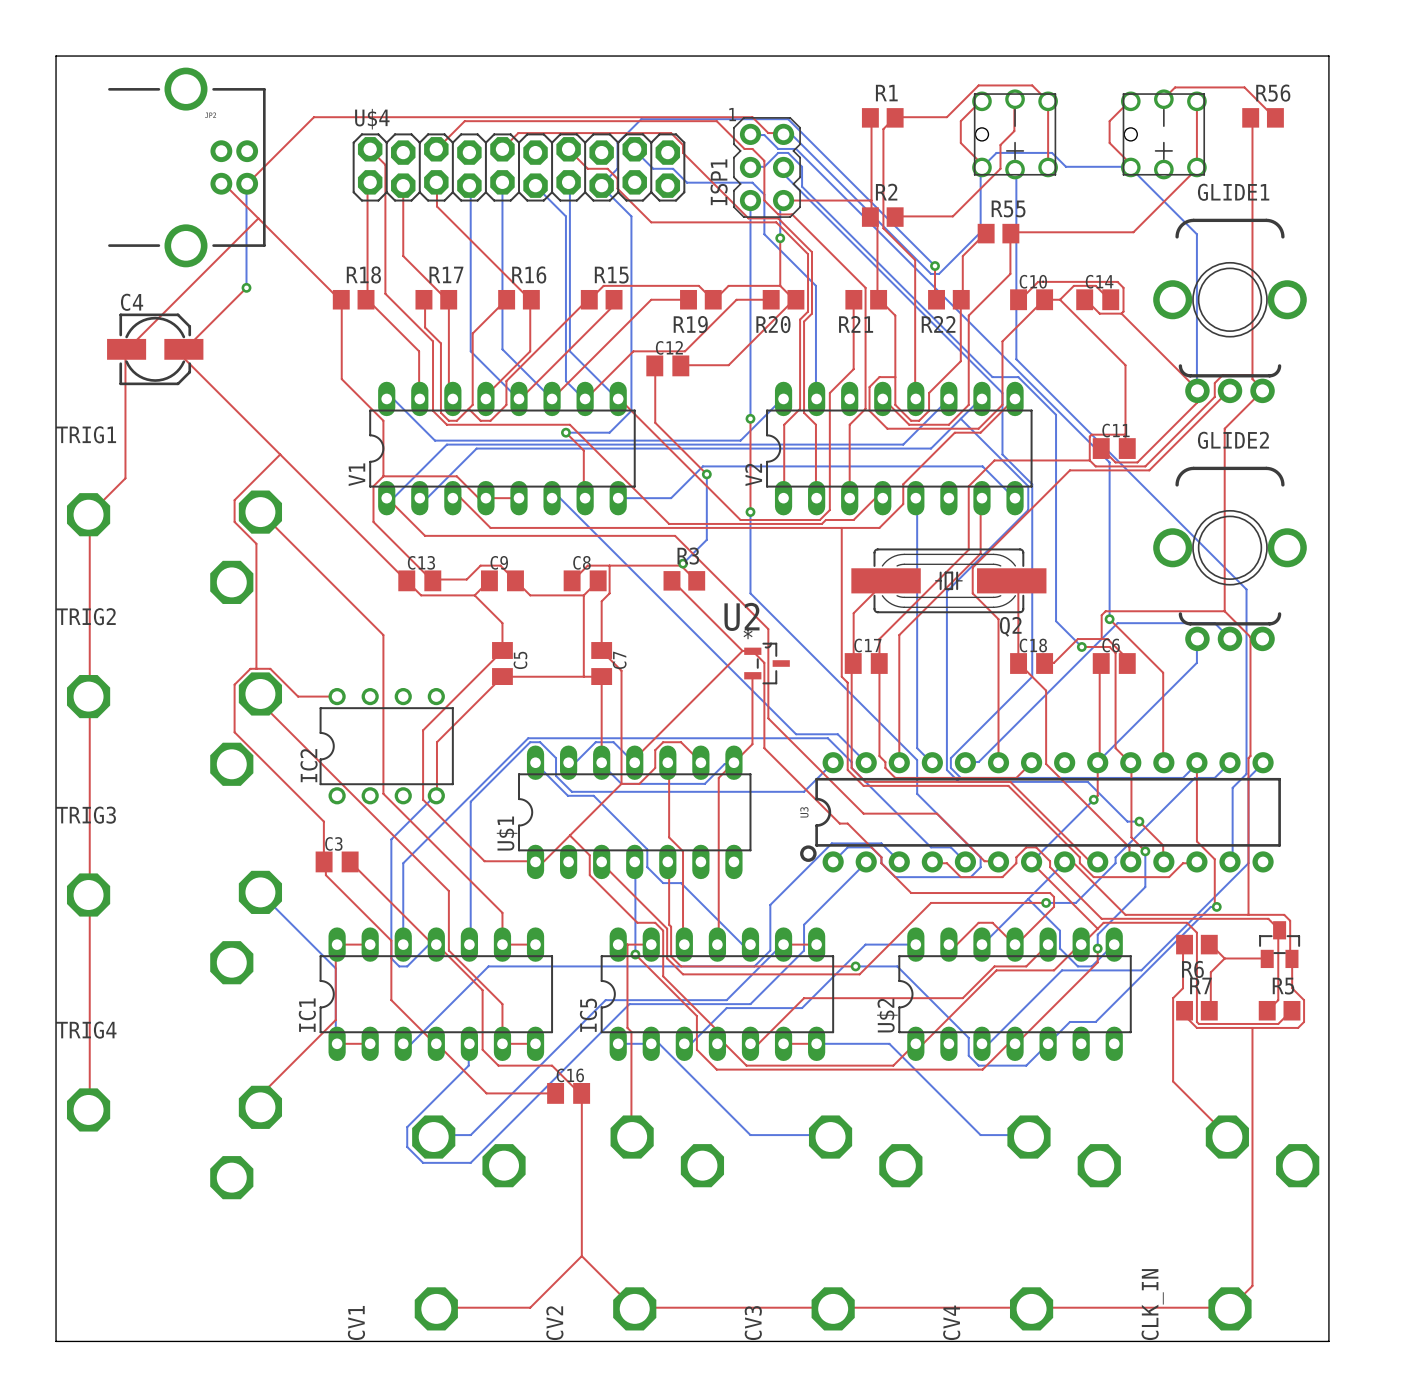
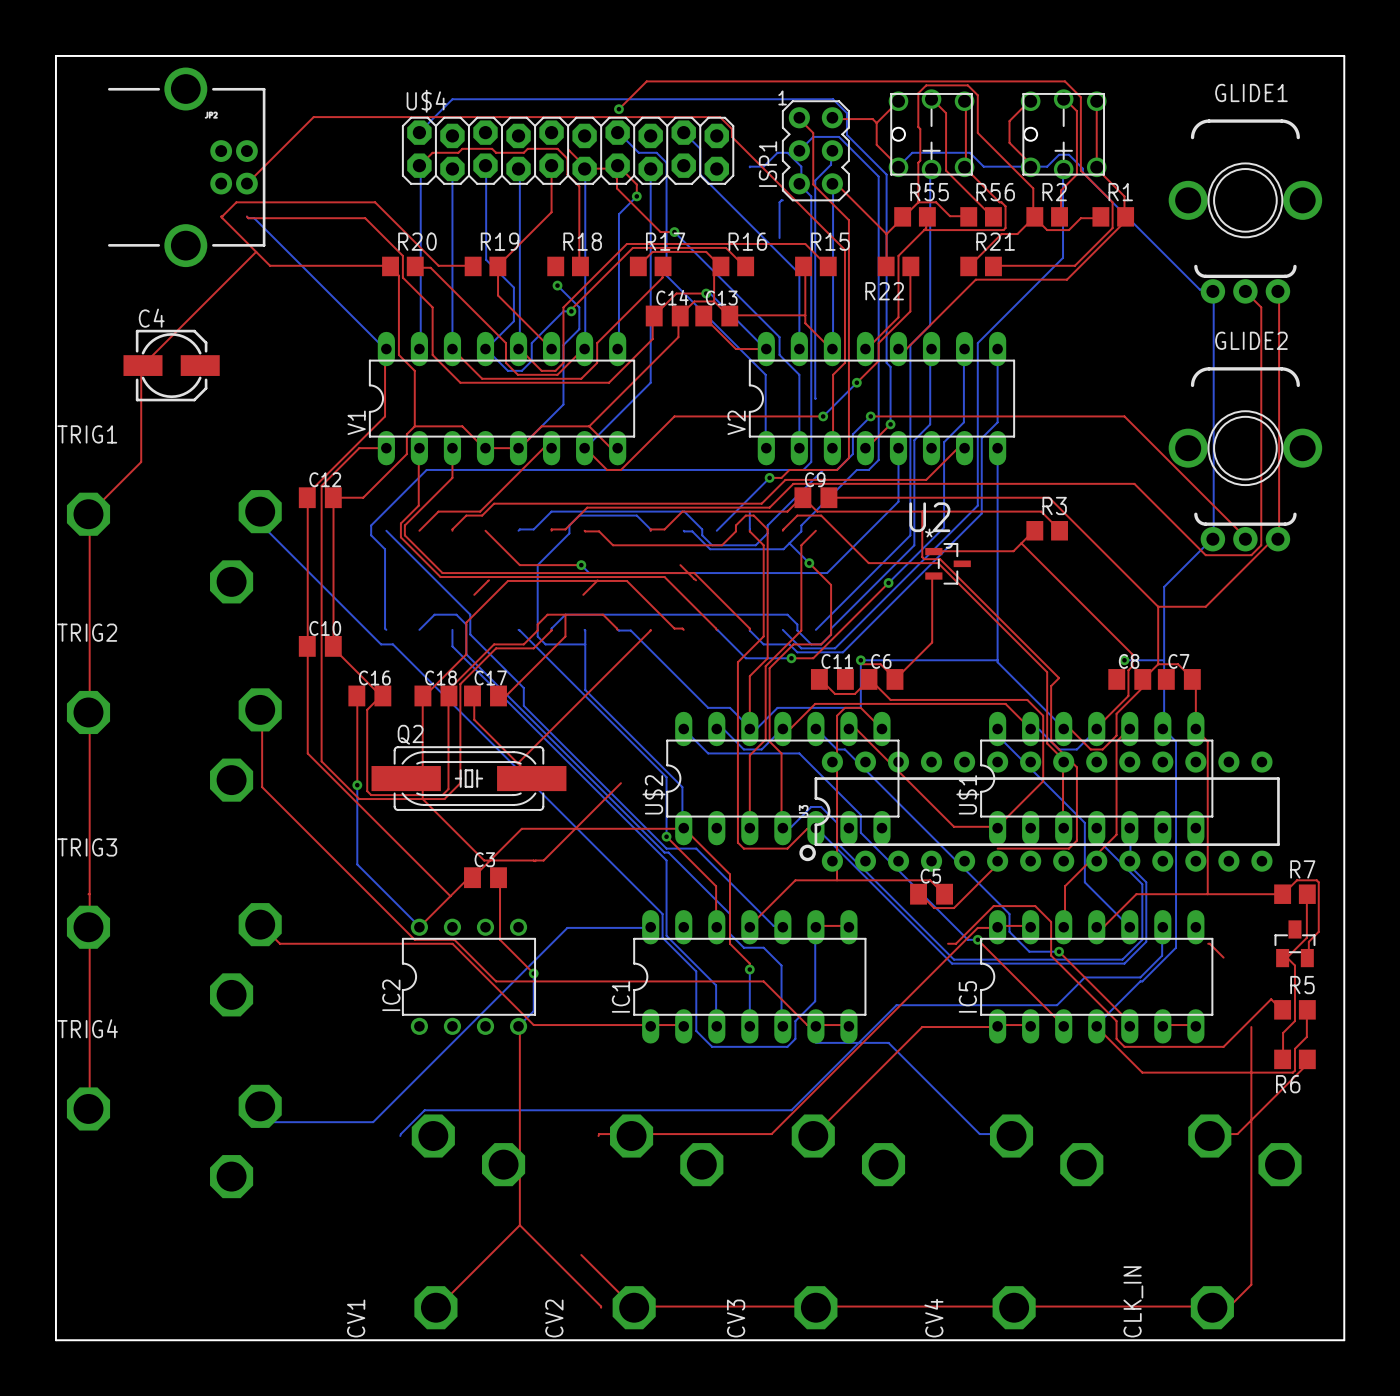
board edge: (1328, 56) (1328, 1341) -> (1327, 55) (1344, 55) (1344, 1340) (1327, 1340)
top track: none -> (931, 99) (946, 113) (946, 170) (993, 216)
top track: (1015, 99) (1014, 131) (1000, 144) (1000, 168) (952, 216) -> (968, 216) (952, 216)
top track: none -> (1063, 99) (1076, 111) (1076, 174) (1061, 190) (1059, 216)
top track: (1163, 99) (1175, 87) (1244, 87) (1275, 117) -> none
top track: none -> (898, 101) (876, 123)
top track: none -> (964, 101) (964, 167) (1005, 206) (1005, 228) (1003, 230) (924, 230)
top track: (981, 101) (960, 121) (960, 142) (980, 162) (981, 167) -> (1030, 101) (1009, 121) (1009, 142) (1029, 162) (1030, 167)
top track: none -> (1096, 101) (1096, 168) (1124, 196) (1124, 222) (1067, 279) (975, 279) (906, 349) (898, 349)
top track: (1130, 101) (1109, 121) (1109, 142) (1129, 162) (1130, 167) -> none
top track: (1196, 101) (1196, 168) (1133, 232) (1010, 233) (1010, 273) (968, 315) (968, 404) (948, 424) (909, 424) (882, 398) -> none
top track: none -> (618, 109) (646, 81) (1065, 81) (1080, 97) (1080, 170) (1112, 202) (1112, 228) (1074, 265) (993, 266)
via: none -> (618, 109)
top track: (720, 117) (752, 117) (768, 133) (783, 134) -> (720, 117) (731, 128) (731, 136)
top track: none -> (799, 117) (813, 132) (813, 184) (848, 220) (848, 424)
top track: none -> (832, 117) (872, 119) (876, 123)
top track: (870, 117) (871, 218) -> (832, 183) (837, 184) (870, 218)
R1 position: (882, 117) -> (1113, 216)
top track: (1250, 117) (1252, 119) (1252, 379) (1262, 390) -> none
R56 position: (1263, 117) -> (981, 216)
top track: none -> (876, 123) (876, 144) (898, 167)
bottom track: none -> (419, 132) (452, 99) (833, 99) (846, 113) (846, 134) (886, 174) (886, 362) (890, 366) (890, 424)
bottom track: none -> (617, 132) (638, 152) (656, 152) (666, 162) (666, 275) (765, 374) (765, 448)
bottom track: none -> (683, 132) (700, 148) (700, 174) (799, 273) (799, 349)
bottom track: (750, 134) (764, 135) (778, 148) (796, 148) (1109, 462) (1109, 619) -> none
bottom track: (783, 134) (792, 135) (931, 273) (938, 273) (980, 232) (980, 168) (996, 152) (1052, 152) (1065, 166) (1130, 167) (1196, 234) (1197, 390) -> none
part: none -> (931, 134)
part: (1015, 134) -> none
part: none -> (1063, 134)
part: (1163, 134) -> none
top track: (732, 137) (716, 121) (464, 121) (436, 149) -> none
top track: (744, 148) (752, 148) (764, 160) (764, 200) (778, 214) (792, 214) (865, 287) (865, 408) (849, 424) -> (743, 148) (844, 249) (844, 362) (833, 374) (832, 448)
top track: (370, 149) (385, 164) (385, 293) (433, 341) -> (246, 216) (248, 218) (365, 218) (402, 255) (402, 277) (432, 307) (432, 341)
top track: (502, 149) (518, 133) (671, 133) (683, 144) (683, 152) (748, 218) (778, 218) (811, 252) (811, 313) (804, 321) (804, 412) (815, 424) (816, 498) -> none
bottom track: (634, 149) (653, 168) (673, 168) (686, 182) (752, 182) (764, 194) (764, 234) (815, 285) -> (832, 150) (831, 164) (815, 180) (815, 285)
bottom track: none -> (799, 150) (813, 136) (839, 136) (878, 176) (878, 460) (868, 469) (856, 469) (801, 525) (801, 531) (783, 549) (710, 549) (692, 531) (683, 530)
bottom track: none -> (419, 165) (419, 349)
top track: none -> (419, 165) (432, 152) (458, 152) (462, 148) (492, 148) (496, 152) (523, 152) (527, 148) (557, 148) (567, 158) (567, 174) (579, 186) (580, 266)
bottom track: none -> (485, 165) (486, 259) (513, 287) (513, 321) (486, 349)
top track: none -> (551, 165) (551, 212) (497, 266) (498, 295) (551, 349)
top track: none -> (617, 165) (636, 184) (636, 196)
U$4 position: (518, 167) -> (568, 150)
ISP1 position: (767, 167) -> (815, 150)
bottom track: (783, 167) (784, 174) (1002, 393) (1002, 454) (1032, 484) (1032, 676) (950, 758) (950, 768) (960, 777) (1183, 777) (1196, 762) -> none
bottom track: none -> (898, 167) (912, 152) (969, 152) (983, 166) (1030, 167) (1047, 166) (1059, 154) (1068, 154) (1082, 168) (1082, 172) (1199, 289) (1211, 289) (1213, 291) (1213, 537) (1164, 586) (1162, 729) (1176, 741) (1176, 947) (1096, 1026)
top track: (1048, 167) (1048, 101) (1032, 85) (978, 85) (946, 117) (895, 117) (883, 129) (883, 228) (915, 260) (915, 398) -> none
bottom track: none -> (452, 168) (452, 349)
bottom track: none -> (518, 168) (518, 349)
bottom track: none -> (584, 168) (584, 349)
bottom track: none -> (931, 169) (930, 325) (910, 345) (910, 535) (815, 629)
bottom track: (1015, 169) (1016, 359) (1246, 589) (1246, 773) (1232, 787) (1232, 859) (1229, 861) -> none
bottom track: none -> (1063, 169) (1063, 257) (977, 343) (977, 505) (835, 648) (801, 648) (782, 629)
top track: (370, 182) (367, 184) (367, 299) -> none
top track: (436, 182) (436, 206) (530, 299) -> none
bottom track: (502, 182) (502, 349) (552, 398) -> none
bottom track: (568, 182) (569, 351) (618, 398) -> none
top track: (221, 183) (222, 182) (341, 299) (341, 379) (383, 420) (383, 476) -> none
bottom track: (247, 183) (246, 287) -> none
bottom track: none -> (832, 183) (832, 349)
top track: (403, 185) (403, 256) (448, 299) (448, 394) (452, 398) -> none
bottom track: (469, 185) (470, 351) (518, 398) -> none
bottom track: (535, 185) (565, 216) (565, 381) (585, 398) -> none
bottom track: none -> (636, 196) (618, 214) (617, 349)
via: none -> (636, 196)
bottom track: (811, 196) (992, 377) (1018, 377) (1056, 414) (1056, 621) (1081, 646) -> (811, 196) (811, 462) (803, 469) (426, 469) (371, 525) (371, 535) (385, 549) (386, 629)
bottom track: (750, 200) (750, 418) -> none
top track: (783, 200) (871, 200) -> none
top track: none -> (918, 202) (886, 234)
top track: none -> (918, 202) (918, 162) (920, 160) (918, 93) (926, 85) (967, 85) (977, 95) (977, 132) (1033, 188) (1034, 216)
bottom track: none -> (246, 216) (254, 218) (386, 349)
top track: (950, 216) (895, 217) -> (950, 216) (936, 202) (918, 202)
R2 position: (882, 217) -> (1047, 216)
top track: none -> (927, 216) (926, 228) (898, 255) (898, 317) (865, 349)
top track: none -> (1034, 216) (1017, 234) (1001, 234) (968, 266)
top track: none -> (1034, 216) (1047, 230) (1068, 230) (1080, 218) (1100, 216)
top track: (258, 218) (125, 349) (125, 478) -> (256, 251) (141, 366) (141, 462) (125, 477)
top track: (651, 222) (776, 222) (808, 254) (808, 311) (800, 319) (800, 408) (784, 424) (783, 498) -> (650, 222) (660, 232) (674, 232)
top track: (877, 224) (877, 299) (895, 315) (895, 404) (911, 420) (919, 420) (929, 410) (929, 393) (960, 361) (962, 256) (986, 233) -> (876, 224) (886, 234)
bottom track: none -> (674, 232) (779, 337) (779, 354) (799, 374) (799, 448)
via: none -> (674, 232)
R55 position: (998, 233) -> (915, 216)
top track: none -> (886, 234) (886, 266)
top track: (780, 238) (780, 285) -> none
via: (780, 238) -> none
top track: none -> (415, 266) (430, 267) (505, 343) (505, 362) (517, 374) (557, 374) (584, 349)
top track: none -> (473, 266) (438, 265) (375, 202) (236, 202) (221, 216) (270, 265) (390, 266) (398, 275) (398, 354) (414, 370) (414, 426)
top track: none -> (638, 266) (652, 251) (706, 251) (720, 266) (714, 273) (714, 301)
top track: none -> (663, 266) (662, 277) (597, 343) (597, 362) (581, 378) (482, 378) (452, 349)
top track: none -> (745, 266) (726, 247) (632, 247) (571, 311)
top track: none -> (803, 266) (805, 267) (805, 323) (832, 349)
top track: none -> (828, 266) (805, 243) (626, 243) (563, 307) (563, 362) (555, 370) (541, 370) (518, 349)
top track: none -> (910, 266) (910, 311) (878, 343) (878, 360) (856, 382)
bottom track: (935, 266) (788, 119) (641, 119) (617, 142) (617, 168) (601, 184) (631, 216) (631, 410) (609, 432) (565, 432) -> none
top track: (935, 266) (935, 299) (936, 299) -> none
via: (935, 266) -> none
via: none -> (557, 285)
top track: (780, 285) (728, 285) (714, 299) (698, 285) (603, 285) (506, 381) (506, 404) (490, 420) (480, 420) (468, 408) -> none
top track: (780, 285) (794, 299) -> none
top track: (246, 287) (184, 349) -> none
via: (246, 287) -> none
top track: none -> (1245, 291) (1261, 307) (1261, 545) (1251, 555) (1205, 555) (1134, 483) (793, 483) (769, 507) (587, 507) (565, 529) (551, 530)
top track: none -> (1277, 291) (1279, 537) (1273, 539) (1205, 606) (1158, 606)
bottom track: none -> (706, 293) (710, 293) (766, 349)
via: none -> (706, 293)
R18 position: (353, 299) -> (568, 266)
top track: (367, 299) (419, 351) (419, 398) -> none
top track: (423, 299) (425, 327) (440, 343) (440, 412) (448, 420) (456, 420) (472, 404) (472, 333) (506, 299) -> none
R17 position: (436, 299) -> (650, 266)
R16 position: (518, 299) -> (733, 266)
top track: (530, 299) (530, 351) (486, 394) (485, 398) -> none
R15 position: (601, 299) -> (815, 266)
top track: (614, 299) (613, 305) (518, 398) -> none
top track: (688, 299) (651, 299) (552, 398) -> none
R19 position: (700, 299) -> (485, 266)
top track: (771, 299) (736, 299) (685, 351) (633, 351) (585, 398) -> none
R20 position: (783, 299) -> (402, 266)
top track: (794, 299) (728, 365) (680, 365) -> none
top track: (853, 299) (853, 369) (829, 393) (829, 510) (819, 519) (740, 519) (618, 398) -> none
R21 position: (866, 299) -> (981, 266)
R22 position: (948, 299) -> (898, 266)
top track: (1018, 299) (1038, 281) (1117, 281) (1123, 287) (1123, 311) (1121, 313) -> none
C10 position: (1031, 299) -> (320, 646)
top track: (1060, 299) (1044, 299) (1002, 341) (1002, 404) (978, 428) (887, 428) (869, 410) (869, 387) (879, 377) (895, 377) -> none
top track: (1060, 299) (1073, 285) (1095, 285) (1110, 299) -> none
top track: (1060, 299) (1125, 365) (1125, 448) (1127, 448) -> none
top track: (1084, 299) (1099, 313) (1121, 313) -> none
C14 position: (1097, 299) -> (667, 316)
top track: none -> (714, 301) (694, 301) (678, 317) (678, 337) (589, 426)
top track: none -> (714, 301) (729, 316) (805, 315)
GLIDE1 position: (1229, 310) -> (1245, 211)
bottom track: none -> (571, 311) (563, 311) (531, 343) (531, 360) (521, 370) (507, 370) (486, 349)
via: none -> (571, 311)
top track: (1121, 313) (1196, 389) (1196, 402) (1137, 462) (1115, 462) (1101, 448) -> none
top track: none -> (703, 316) (735, 349) (766, 349)
R19 name position: R19 (690, 324) -> R19 (500, 241)
R20 name position: R20 (773, 324) -> R20 (417, 241)
R21 name position: R21 (856, 324) -> R21 (995, 241)
C4 position: (155, 349) -> (171, 365)
top track: (184, 349) (184, 359) (421, 595) (474, 595) (502, 623) (502, 650) (423, 730) -> (683, 629) (674, 628) (626, 580) (507, 580) (466, 622) (466, 654) (422, 695) (422, 729)
top track: none -> (386, 349) (385, 416) (307, 493) (307, 753) (450, 896)
bottom track: none -> (931, 349) (930, 424) (914, 440) (914, 545) (831, 628) (831, 634) (821, 644) (811, 644) (797, 630) (797, 624) (787, 614) (565, 614) (551, 629)
bottom track: none -> (964, 349) (963, 422) (944, 442) (944, 527) (888, 582)
bottom track: none -> (997, 349) (997, 422) (981, 438) (981, 513) (842, 652) (797, 652) (789, 644) (763, 644) (749, 629)
top track: (433, 355) (433, 410) (446, 424) (569, 424) (669, 523) (821, 523) (825, 519) (853, 519) (875, 498) -> (432, 354) (460, 382) (609, 382) (652, 339) (652, 317) (676, 293) (706, 293)
top track: (654, 365) (655, 422) (706, 474) -> none
C12 position: (667, 365) -> (320, 497)
top track: (1252, 375) (1222, 375) (1214, 383) (1214, 396) (1145, 466) (1095, 466) (1089, 460) -> none
bottom track: none -> (856, 382) (823, 416)
via: none -> (856, 382)
top track: (1229, 390) (1149, 470) (1069, 470) (972, 567) (972, 593) (998, 619) (998, 762) -> none
top track: (1262, 391) (1224, 428) (1224, 611) -> none
bottom track: (386, 398) (393, 398) (435, 440) (740, 440) (783, 398) -> none
bottom track: (948, 398) (903, 444) (446, 444) (393, 498) (386, 498) -> none
bottom track: (981, 398) (931, 448) (767, 448) -> none
top track: (1015, 398) (980, 432) (954, 432) (903, 484) (903, 504) (879, 527) (490, 527) (460, 498) (452, 498) -> none
top track: none -> (823, 416) (674, 416) (620, 469) (607, 469) (584, 448)
via: none -> (823, 416)
bottom track: none -> (870, 416) (852, 434) (852, 454) (837, 469) (823, 469) (767, 525) (767, 533) (755, 545) (712, 545) (702, 535) (702, 529) (684, 511) (551, 511) (533, 529) (518, 530)
top track: none -> (870, 416) (1124, 416) (1245, 539)
via: none -> (870, 416)
top track: (750, 418) (750, 512) -> none
via: (750, 418) -> none
bottom track: (960, 418) (1028, 486) (1028, 510) (946, 591) (946, 769) (958, 781) (1087, 781) (1127, 821) (1139, 821) -> none
top track: none -> (890, 424) (865, 448)
via: none -> (890, 424)
top track: none -> (414, 426) (462, 426) (484, 448) (519, 448) (541, 426) (589, 426)
top track: none -> (414, 426) (406, 434) (406, 454) (363, 497) (333, 497)
top track: none -> (589, 426) (611, 448) (617, 448)
top track: (565, 432) (583, 450) (585, 498) -> none
via: (565, 432) -> none
top track: (1125, 434) (1091, 434) (1089, 436) (1089, 460) -> none
top track: none -> (386, 448) (359, 448) (321, 485) (321, 761) (359, 799) (444, 799) (460, 783) (460, 684) (496, 648) (533, 648) (551, 629)
top track: none -> (419, 448) (418, 505) (400, 523) (400, 537) (440, 577) (664, 577) (716, 629)
top track: none -> (452, 448) (452, 477) (404, 525) (404, 535) (442, 573) (694, 573) (749, 629)
V1 position: (502, 448) -> (502, 398)
bottom track: (518, 448) (476, 448) (427, 498) (419, 498) -> none
bottom track: (520, 448) (585, 448) -> (519, 448) (563, 404) (563, 345) (579, 329) (579, 307) (557, 285)
top track: none -> (551, 448) (543, 448) (480, 511) (438, 511) (419, 530)
bottom track: (585, 448) (766, 448) -> (585, 448) (650, 382) (650, 168)
bottom track: none -> (898, 448) (898, 501) (827, 573) (589, 573) (581, 565)
V2 position: (899, 448) -> (881, 398)
top track: none -> (964, 448) (957, 448) (926, 479) (785, 479) (761, 503) (494, 503) (482, 515) (466, 515) (452, 530)
bottom track: none -> (997, 448) (997, 662) (1063, 729)
C11 position: (1114, 448) -> (832, 679)
top track: (280, 454) (234, 500) (234, 521) (256, 543) (256, 668) -> none
top track: (849, 458) (849, 498) -> (848, 458) (837, 469) (789, 469) (781, 477) (769, 477)
top track: (1089, 460) (994, 460) (968, 486) (968, 549) (879, 639) (879, 756) (885, 762) (885, 768) (895, 777) (1016, 777) (1031, 762) -> none
bottom track: (706, 474) (706, 539) (683, 563) -> none
via: (706, 474) -> none
top track: (383, 476) (456, 476) (478, 498) (518, 498) -> none
top track: (383, 476) (373, 486) (373, 521) (432, 580) (466, 579) (480, 565) (500, 565) (530, 595) (583, 595) (583, 676) -> none
bottom track: none -> (769, 477) (716, 530)
via: none -> (769, 477)
top track: none -> (333, 497) (333, 646) (331, 646) (381, 695) (367, 709) (367, 791) (371, 795) (435, 795)
top track: (386, 498) (425, 535) (675, 535) (768, 629) -> (584, 530) (599, 531) (613, 545) (722, 545) (735, 531) (735, 525) (745, 515) (753, 515) (767, 529) (767, 628)
bottom track: (552, 498) (560, 498) (796, 734) (837, 734) (866, 762) -> none
bottom track: (618, 498) (671, 498) (702, 466) (982, 466) (1015, 498) -> none
top track: none -> (828, 497) (874, 497)
bottom track: (915, 498) (917, 748) (932, 762) -> none
top track: (980, 498) (980, 553) (899, 635) (899, 762) -> (979, 497) (881, 497)
top track: none -> (981, 497) (1049, 497) (1158, 606)
bottom track: none -> (260, 511) (262, 513) (262, 525) (381, 644) (392, 644) (662, 914) (662, 937) (696, 971) (696, 1030) (712, 1046) (787, 1046) (795, 1038) (795, 1021) (815, 1001) (815, 927)
top track: (260, 512) (383, 635) (383, 793) (502, 912) (502, 944) (535, 944) -> none
via: (750, 512) -> none
top track: none -> (922, 511) (922, 557) (924, 559) (940, 559) (1059, 678) (1051, 686) (1051, 741) (1076, 767) (1076, 840) (1068, 848) (997, 848)
top track: (841, 527) (841, 676) (847, 682) (847, 769) (863, 785) (1008, 785) (1079, 857) (1079, 863) (1093, 877) (1169, 877) (1183, 863) (1196, 861) -> none
bottom track: none -> (386, 530) (470, 614) (470, 634) (523, 688) (523, 705) (666, 848) (696, 848) (773, 925) (782, 927)
top track: none -> (485, 530) (519, 565) (581, 565)
bottom track: none -> (650, 530) (636, 515) (579, 515) (569, 525) (569, 533) (537, 565) (537, 636) (545, 644) (585, 644)
top track: none -> (650, 530) (664, 529) (682, 511) (787, 511) (801, 497) (817, 511) (1041, 511) (1059, 530)
bottom track: (750, 531) (750, 593) (917, 760) (917, 793) (980, 857) (980, 867) (970, 877) (895, 877) (881, 863) (881, 857) (871, 847) (847, 847) (833, 861) -> none
top track: none -> (749, 530) (763, 545) (763, 636) (737, 662) (737, 842) (743, 848) (787, 848) (807, 828) (815, 828)
top track: none -> (782, 530) (797, 515) (821, 515) (868, 563) (938, 563) (1047, 672) (1047, 743) (1063, 759) (1063, 828)
top track: none -> (815, 530) (801, 545) (801, 630) (765, 666) (765, 739) (749, 755) (749, 828)
top track: none -> (1034, 530) (1013, 551) (933, 551)
bottom track: none -> (789, 543) (809, 563)
top track: none -> (1021, 543) (1132, 654) (1132, 666) (1128, 670) (1128, 695) (1096, 729)
GLIDE2 position: (1229, 558) -> (1245, 459)
top track: (683, 563) (681, 565) (587, 565) (572, 580) -> none
via: (683, 563) -> none
top track: none -> (809, 563) (831, 584) (831, 634) (821, 644) (793, 644) (769, 668) (769, 741) (781, 753) (782, 828)
via: none -> (809, 563)
via: none -> (581, 565)
top track: (609, 565) (609, 593) (601, 601) (601, 650) (621, 670) (621, 783) (639, 783) (655, 768) (655, 750) (663, 742) (681, 742) (700, 762) -> none
top track: none -> (933, 576) (932, 577) (932, 642) (894, 679) (880, 664) (860, 664) (860, 660)
C13 position: (419, 580) -> (716, 316)
C9 position: (502, 580) -> (815, 497)
C8 position: (585, 580) -> (1129, 679)
top track: (671, 580) (742, 650) -> none
R3 position: (684, 580) -> (1047, 530)
top track: (886, 580) (853, 613) (851, 768) (865, 781) (1010, 781) (1089, 861) (1097, 861) -> none
Q2 position: (948, 580) -> (468, 778)
top track: (1011, 580) (1018, 587) (1018, 662) (1046, 690) (1046, 764) (1129, 847) (1130, 861) -> none
top track: none -> (888, 582) (813, 658) (791, 658)
via: none -> (888, 582)
top track: none -> (1158, 606) (1158, 664)
top track: (1224, 611) (1250, 637) -> none
top track: (1224, 611) (1105, 611) (1101, 615) (1101, 639) -> none
top track: none -> (565, 614) (565, 636) (505, 695) (498, 695)
top track: (1109, 619) (1163, 672) (1163, 762) -> none
via: (1109, 619) -> none
Q2 name position: Q2 (1010, 626) -> Q2 (410, 734)
bottom track: none -> (419, 629) (434, 614) (456, 614) (466, 624) (466, 654) (664, 852) (668, 852) (729, 914) (729, 933) (743, 947) (763, 947) (781, 965) (782, 1026)
bottom track: none -> (452, 629) (452, 646) (666, 860) (666, 935) (716, 985) (716, 1026)
bottom track: none -> (518, 629) (666, 777) (666, 836)
bottom track: none -> (584, 629) (585, 690) (682, 787) (683, 828)
bottom track: none -> (617, 629) (630, 630) (708, 707) (729, 707) (749, 727)
top track: none -> (650, 629) (517, 763)
bottom track: none -> (716, 629) (745, 658) (791, 658)
top track: (1250, 637) (1248, 914) -> none
bottom track: (1197, 638) (1196, 662) (1097, 762) -> none
bottom track: (1229, 638) (1214, 623) (1117, 623) (978, 762) (965, 762) -> none
top track: (1081, 646) (1109, 646) (1115, 652) (1115, 748) (1131, 764) (1131, 837) (1145, 851) -> none
via: (1081, 646) -> none
top track: (742, 650) (752, 650) (764, 662) (764, 748) (839, 823) (847, 823) (881, 857) (881, 863) (911, 893) (1050, 893) (1054, 896) (1054, 906) (1016, 944) (992, 922) (978, 922) -> (1282, 1009) (1271, 999) (1223, 1046) (1124, 1046) (1116, 1038) (1116, 1021) (1051, 955) (1051, 921) (1035, 906) (993, 906) (977, 921)
top track: (742, 650) (635, 758) (634, 762) -> none
top track: (768, 658) (768, 718) (863, 813) (936, 813) (984, 861) (998, 861) -> (767, 658) (749, 676) (749, 729)
via: none -> (791, 658)
via: none -> (860, 660)
bottom track: none -> (997, 660) (860, 660) (860, 707) (777, 707) (757, 727) (749, 727)
bottom track: none -> (1124, 660) (1164, 660)
top track: (1125, 660) (1125, 656) (1107, 639) (1077, 639) (1054, 662) (1044, 663) -> none
via: none -> (1124, 660)
C5 rotation: 0° (502, 663) -> 90° clockwise (931, 894)
C5 position: (502, 663) -> (931, 894)
C7 rotation: 0° (601, 663) -> 90° clockwise (1179, 679)
C7 position: (601, 663) -> (1179, 679)
U2 position: (767, 663) -> (948, 563)
C17 position: (866, 663) -> (485, 695)
C18 position: (1031, 663) -> (435, 695)
top track: (1101, 663) (1099, 664) (1099, 760) (1097, 762) (1097, 795) (1093, 799) -> none
C6 position: (1114, 663) -> (881, 679)
top track: none -> (1158, 664) (1142, 680) (1142, 688) (1116, 713) (1116, 735) (1102, 749) (1090, 749) (1070, 729) (1063, 729)
top track: none -> (1158, 664) (1178, 664) (1195, 682) (1195, 729) (1207, 741) (1207, 894)
top track: (752, 675) (752, 744) (718, 777) (717, 944) -> none
top track: (601, 676) (502, 676) (436, 742) (436, 795) -> (617, 629) (603, 614) (547, 614) (537, 624) (537, 630) (523, 644) (494, 644) (450, 688) (450, 695) (448, 695) (448, 789) (442, 795) (436, 795)
top track: (601, 676) (601, 762) -> none
top track: none -> (819, 679) (835, 693) (854, 693) (868, 679) (890, 699) (1027, 699) (1043, 715) (1043, 781) (997, 826) (954, 826) (856, 729) (848, 729)
top track: (260, 693) (262, 694) (262, 704) (448, 891) (448, 950) (502, 1004) (502, 1043) (535, 1043) -> none
top track: (337, 696) (298, 696) (270, 668) (250, 668) (234, 684) (234, 732) (323, 821) (325, 875) (391, 940) (391, 1000) (486, 1093) (555, 1093) -> none
top track: none -> (356, 695) (357, 785)
top track: none -> (472, 695) (474, 695) (474, 719) (531, 778)
top track: none -> (260, 709) (262, 711) (262, 787) (414, 939) (454, 939) (496, 981) (763, 981) (807, 1025) (848, 1026)
TRIG2 position: (174, 729) -> (174, 745)
bottom track: none -> (683, 729) (708, 753) (799, 753) (860, 814) (860, 832) (967, 939) (977, 939)
bottom track: none -> (716, 729) (724, 729) (743, 749) (761, 749) (782, 729)
top track: none -> (782, 729) (791, 727) (815, 703) (1005, 703) (1030, 729)
bottom track: none -> (815, 729) (837, 749) (844, 749) (1009, 914) (1009, 931) (1029, 951) (1059, 951)
top track: none -> (881, 729) (860, 707) (844, 707) (837, 715) (837, 880)
bottom track: none -> (997, 729) (997, 735) (1084, 822) (1084, 882) (1129, 927)
bottom track: none -> (1030, 729) (1039, 729) (1059, 749) (1076, 749) (1096, 729)
top track: none -> (1129, 729) (1116, 741) (1116, 834) (1065, 886) (1063, 927)
IC2 position: (386, 746) -> (468, 976)
bottom track: (535, 762) (567, 795) (593, 795) (647, 849) (647, 867) (663, 883) (681, 883) (742, 944) (750, 944) -> none
bottom track: (568, 762) (575, 762) (595, 742) (613, 742) (634, 762) -> none
bottom track: (601, 762) (621, 783) (704, 783) (724, 764) (733, 762) -> none
top track: (667, 762) (669, 837) (683, 851) (684, 944) -> none
bottom track: (833, 762) (804, 791) (571, 791) (556, 775) (556, 758) (540, 742) (530, 742) (470, 801) (469, 944) -> none
top track: (1196, 762) (1196, 841) (1214, 859) (1214, 904) (1216, 906) -> none
bottom track: (1229, 762) (1214, 777) (1194, 777) (1115, 857) (1115, 863) (1075, 902) (1046, 902) -> none
bottom track: (1263, 762) (1248, 777) (1248, 863) (1141, 970) (1062, 970) (988, 1043) (981, 1043) -> none
bottom track: none -> (357, 785) (357, 864) (419, 927)
via: none -> (357, 785)
bottom track: (436, 795) (391, 839) (391, 958) (399, 966) (407, 966) (429, 944) (436, 944) -> none
bottom track: (1093, 799) (1031, 861) -> none
via: (1093, 799) -> none
U$1 position: (634, 812) -> (1096, 778)
top track: (1139, 821) (1163, 845) (1163, 861) -> none
via: (1139, 821) -> none
bottom track: none -> (782, 828) (791, 826) (811, 806) (821, 806) (837, 822) (837, 842) (954, 959) (1122, 959) (1142, 939) (1142, 884) (1096, 838) (1096, 828)
bottom track: none -> (815, 828) (952, 963) (1124, 963) (1146, 941) (1146, 882) (1130, 866) (1129, 828)
top track: (569, 835) (589, 855) (589, 875) (637, 922) (655, 922) (663, 930) (663, 976) (716, 1029) (716, 1043) (724, 1043) (746, 1065) (893, 1065) (915, 1043) (923, 1043) (996, 970) (1054, 970) (1103, 922) (1187, 922) (1196, 932) (1196, 1021) (1198, 1023) (1278, 1023) (1291, 1010) -> none
top track: none -> (666, 836) (716, 886) (716, 927)
via: none -> (666, 836)
bottom track: (1145, 851) (1145, 887) (1097, 934) (1097, 948) -> none
via: (1145, 851) -> none
C3 position: (337, 861) -> (485, 877)
top track: (350, 861) (433, 944) -> (369, 943) (432, 943)
top track: (601, 861) (667, 928) (667, 958) (683, 974) (859, 974) (931, 902) (1046, 902) -> none
bottom track: (634, 861) (635, 954) -> none
top track: (667, 861) (671, 956) (681, 966) (855, 966) -> none
bottom track: (866, 861) (804, 924) (804, 950) (750, 1004) (629, 1004) (470, 1162) (423, 1162) (407, 1146) (407, 1127) (468, 1065) (469, 1043) -> none
bottom track: (899, 861) (881, 843) (831, 843) (770, 904) (770, 950) (754, 966) (488, 966) (411, 1043) (403, 1043) -> none
top track: (932, 861) (946, 863) (960, 877) (1002, 877) (1016, 863) (1016, 857) (1026, 847) (1036, 847) (1050, 861) (1050, 867) (1101, 918) (1268, 918) (1279, 930) (1278, 1000) (1267, 1010) -> none
bottom track: (965, 861) (950, 847) (931, 847) (851, 768) (851, 762) (827, 738) (528, 738) (403, 863) (403, 944) -> none
top track: none -> (997, 861) (997, 864) (954, 908) (934, 908) (918, 894)
top track: (1031, 861) (1097, 928) -> none
bottom track: (1064, 861) (981, 944) -> none
top track: (1064, 861) (1073, 863) (1125, 914) (1284, 914) (1290, 920) (1292, 988) (1304, 1000) (1304, 1021) (1298, 1027) (1196, 1027) (1185, 1016) (1184, 1010) -> none
top track: none -> (498, 877) (500, 878) (500, 939) (533, 973)
bottom track: (260, 892) (335, 968) (337, 1043) -> none
top track: none -> (944, 894) (930, 880) (795, 880) (749, 927)
top track: none -> (1307, 894) (1306, 937) (1287, 957) (1294, 965) (1294, 1021) (1283, 1032) (1282, 1059)
bottom track: (1028, 898) (1060, 930) (1060, 948) (1077, 966) (1091, 966) (1114, 944) -> none
via: (1046, 902) -> none
bottom track: (1216, 906) (1210, 906) (1095, 1021) (1069, 1021) (1026, 1065) (978, 1065) (968, 1055) (968, 1037) (897, 966) (855, 966) -> none
via: (1216, 906) -> none
TRIG3 position: (174, 927) -> (174, 959)
top track: none -> (419, 927) (521, 828) (683, 828) (729, 874) (729, 943) (749, 963) (749, 969)
bottom track: none -> (650, 927) (567, 927) (373, 1122) (260, 1122)
top track: none -> (815, 927) (848, 927)
top track: none -> (1030, 927) (997, 925) (997, 927) (977, 927) (771, 1134) (599, 1134) (598, 1136)
top track: none -> (1096, 927) (1104, 925) (1136, 894) (1283, 894) (1296, 880) (1316, 880) (1318, 882) (1318, 931) (1308, 941) (1307, 958)
bottom track: none -> (1162, 927) (1162, 955) (1140, 977) (1084, 977) (1057, 1005) (896, 1005) (791, 1110) (424, 1110) (400, 1136)
top track: none -> (977, 939) (1063, 1026)
via: none -> (977, 939)
top track: (335, 944) (335, 1020) (262, 1093) (262, 1107) (260, 1107) -> (335, 943) (279, 943) (260, 924)
top track: (436, 944) (482, 990) (482, 1049) (498, 1065) (552, 1065) (581, 1093) (581, 1256) (530, 1307) (438, 1307) -> (519, 1225) (438, 1306)
top track: none -> (436, 943) (452, 943) (533, 1025) (683, 1026)
top track: (618, 944) (651, 944) -> none
top track: (627, 944) (627, 1027) (631, 1031) (632, 1137) -> none
bottom track: (783, 944) (726, 1000) (605, 1000) (470, 1135) (435, 1135) (433, 1137) -> none
top track: (783, 944) (816, 944) -> none
bottom track: (915, 944) (865, 944) (802, 1008) (726, 1008) (690, 1043) (684, 1043) -> none
top track: (1048, 944) (1026, 966) (994, 966) (962, 998) (804, 998) (758, 1043) (750, 1043) -> none
top track: (1184, 944) (1183, 944) (1183, 988) (1173, 998) (1173, 1081) (1227, 1137) -> none
R6 position: (1196, 944) -> (1294, 1059)
part position: (1279, 944) -> (1294, 943)
top track: (1097, 948) (1097, 962) (1016, 1043) (1008, 1043) (982, 1069) (716, 1069) (696, 1049) (696, 1016) (635, 954) -> none
via: (1097, 948) -> none
top track: none -> (1059, 951) (1128, 1021) (1129, 1026)
via: none -> (1059, 951)
via: (635, 954) -> none
top track: (1267, 958) (1224, 958) (1210, 972) (1209, 1010) -> none
via: (855, 966) -> none
bottom track: none -> (749, 969) (749, 1026)
via: none -> (749, 969)
bottom track: none -> (533, 973) (533, 1011) (518, 1026)
via: none -> (533, 973)
IC1 position: (436, 994) -> (749, 976)
IC5 position: (717, 994) -> (1096, 976)
U$2 position: (1015, 994) -> (782, 778)
R7 position: (1196, 1010) -> (1294, 894)
R5 position: (1279, 1010) -> (1294, 1009)
top track: none -> (1307, 1009) (1306, 1036) (1294, 1048) (1294, 1070) (1292, 1072) (1142, 1072) (1096, 1026)
top track: none -> (518, 1026) (519, 1225)
top track: none -> (1030, 1026) (997, 1025) (997, 1027) (922, 1027) (813, 1136)
top track: none -> (1162, 1026) (1195, 1026)
top track: (337, 1043) (370, 1043) -> none
bottom track: (618, 1043) (659, 1043) (750, 1135) (829, 1135) (830, 1137) -> none
top track: (783, 1043) (816, 1043) -> none
top track: none -> (1307, 1059) (1306, 1064) (1237, 1134) (1211, 1134) (1209, 1136)
C16 position: (568, 1093) -> (369, 695)
CV3 position: (865, 1222) -> (848, 1221)
CV4 position: (1064, 1222) -> (1046, 1221)
CLK_IN position: (1262, 1222) -> (1244, 1221)
top track: none -> (519, 1225) (601, 1307)

